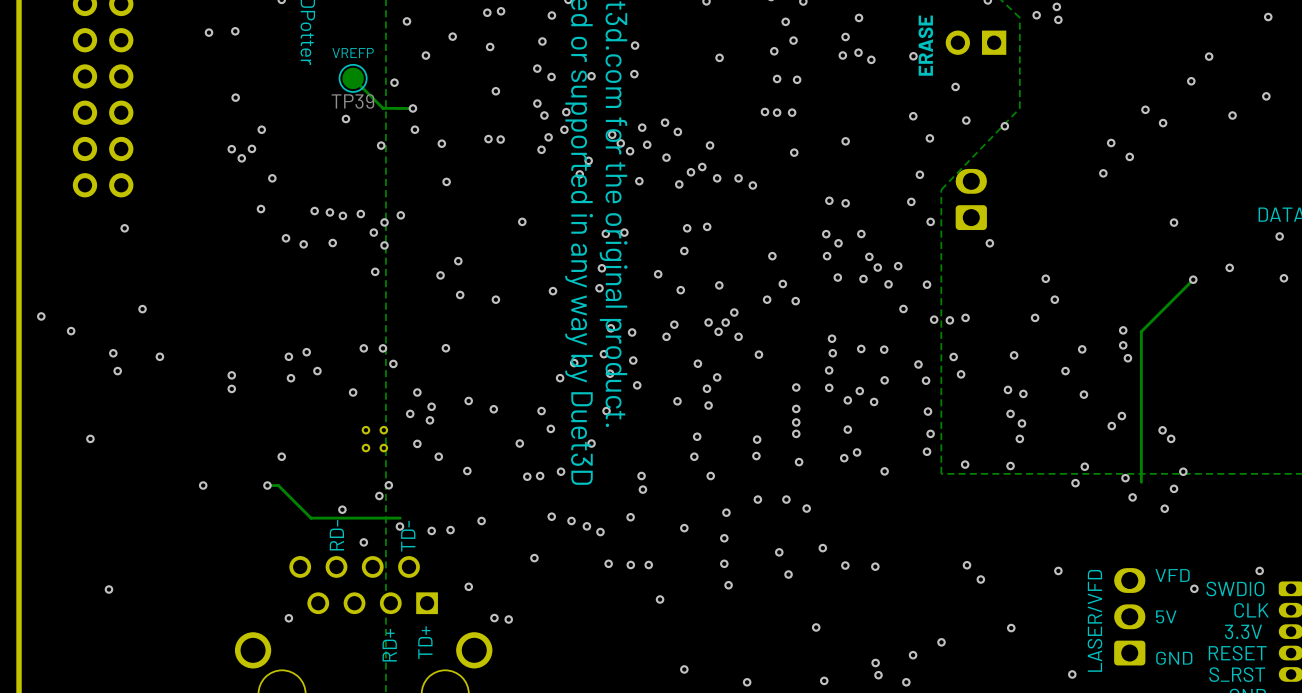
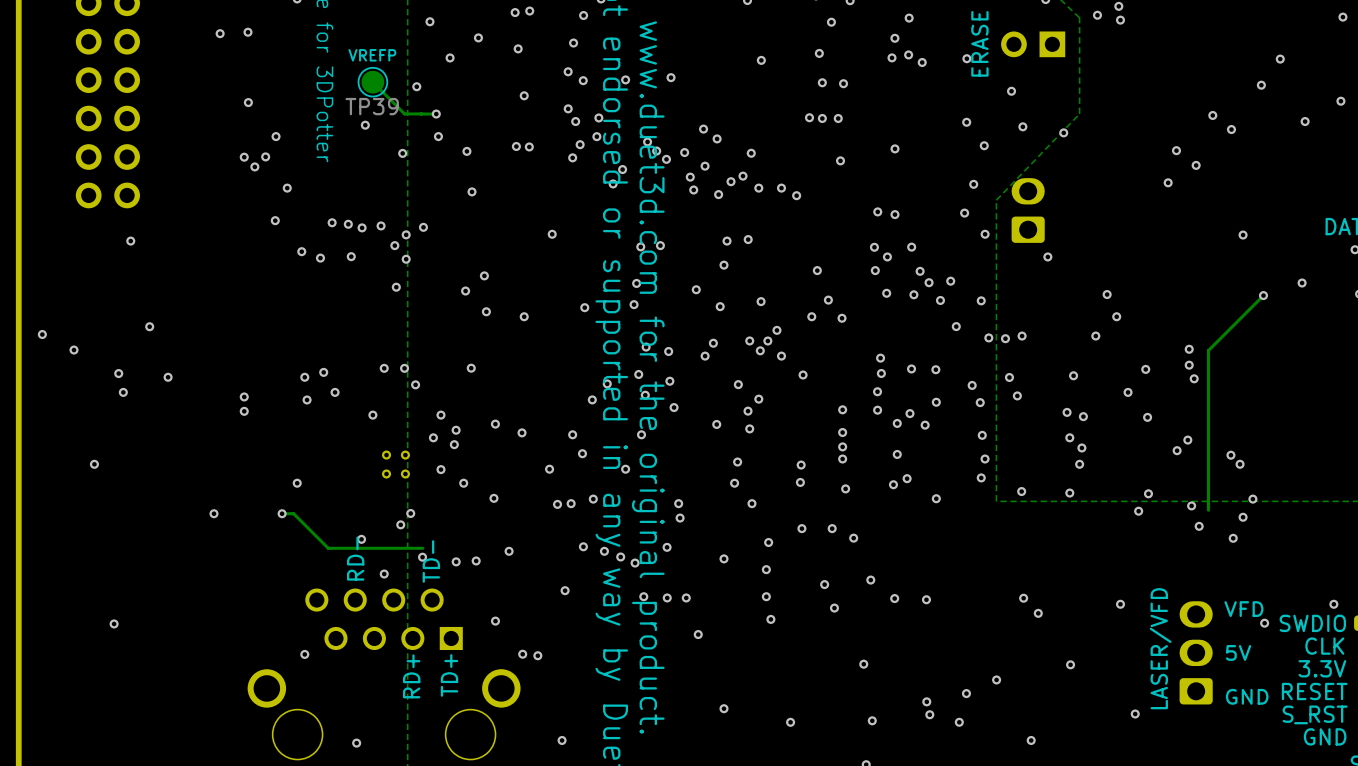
via: (793, 40) -> none
via: (635, 45) -> none
via: (642, 127) -> none
via: none -> (690, 177)
via: none -> (693, 190)
via: (639, 181) -> none

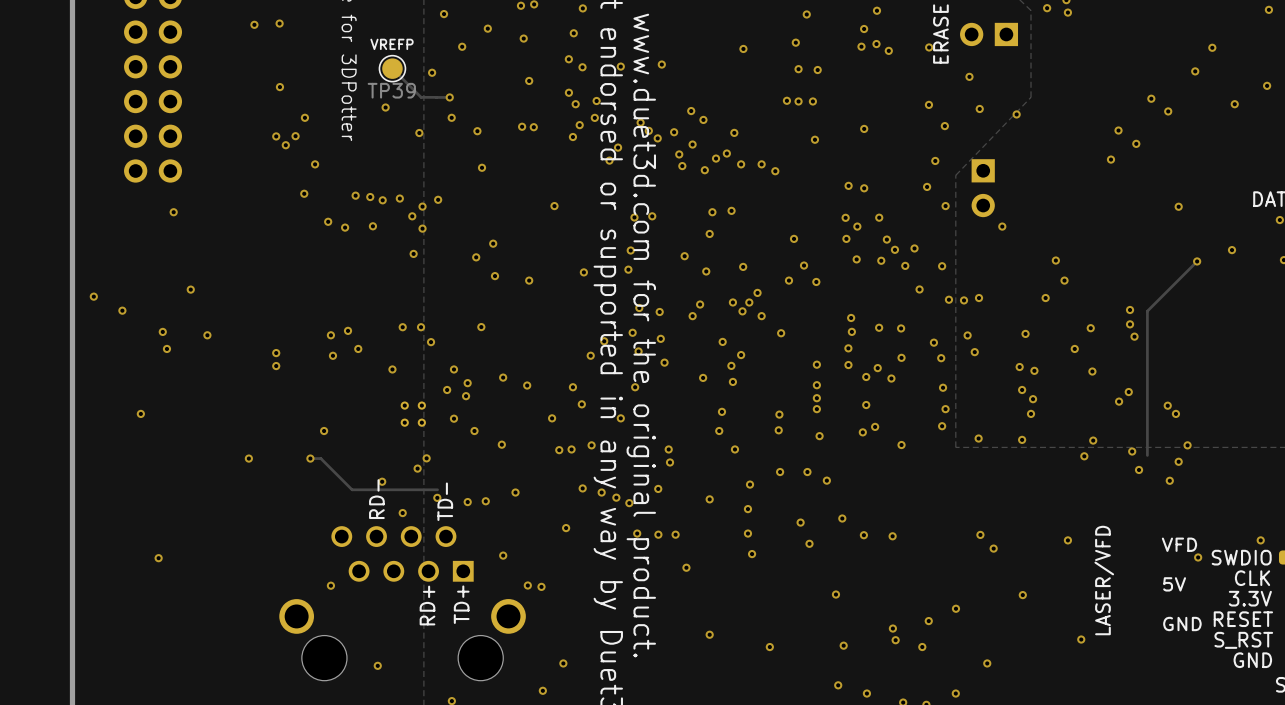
part footprint: [1011, 178, 1045, 243] -> [971, 159, 995, 218]
part: (1196, 652) -> none

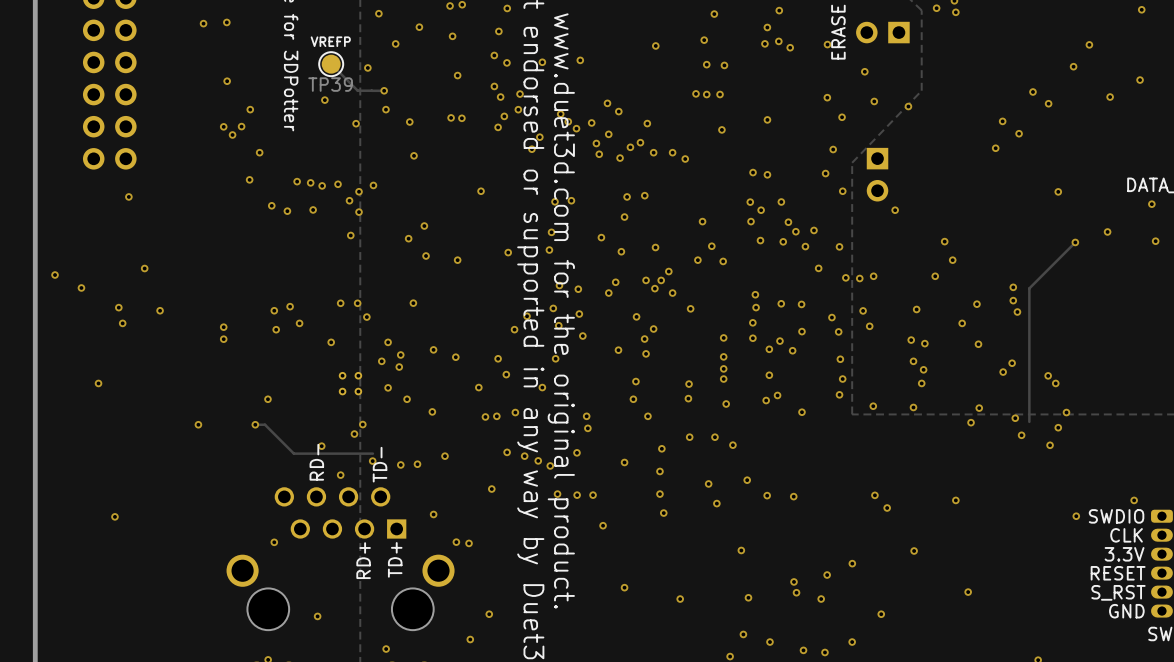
text: VFD (1179, 544) -> none
text: LASER/VFD (1104, 580) -> none
text: 5V (1174, 584) -> none
text: GND (1182, 624) -> none

